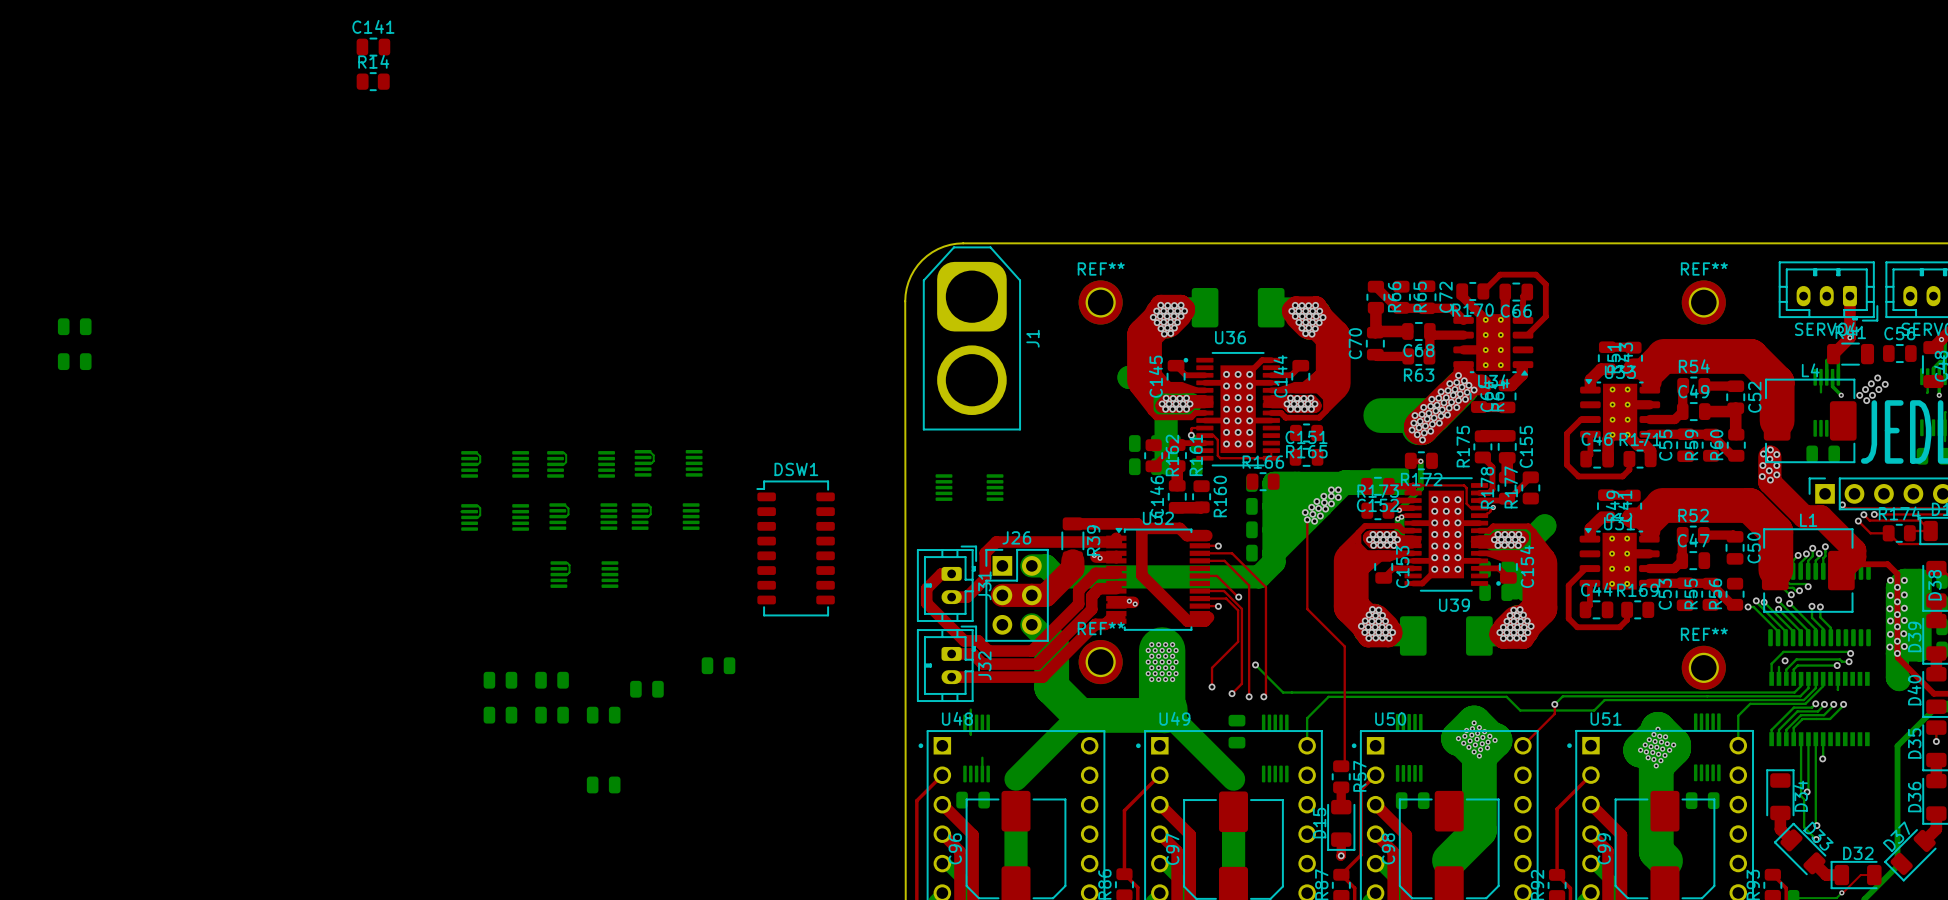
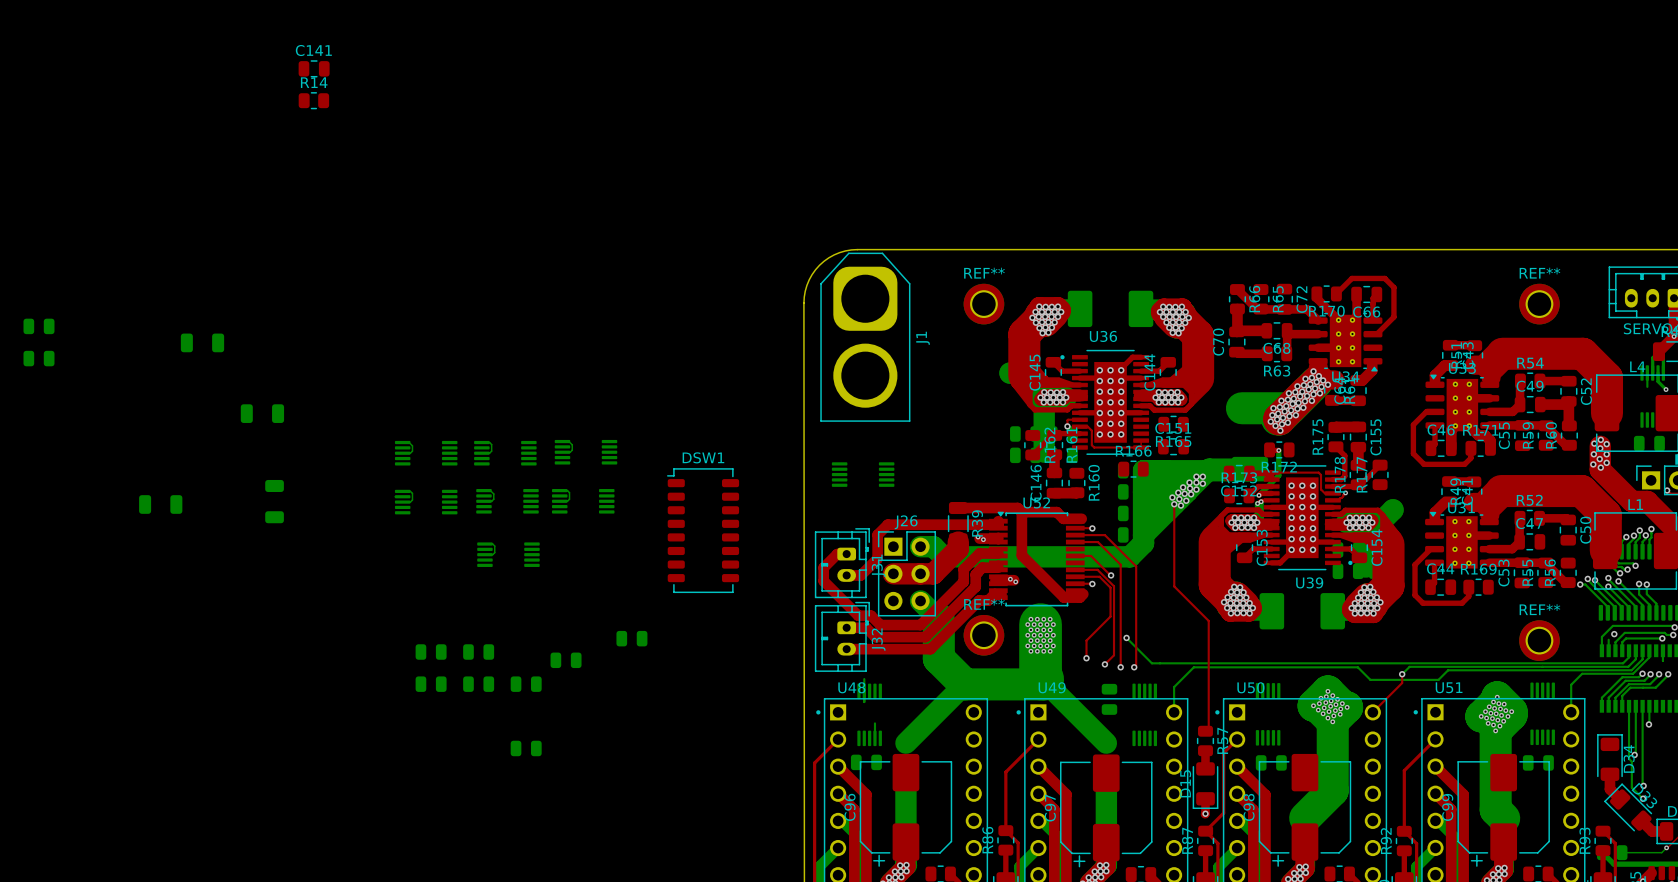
part: none -> (202, 342)
part: none -> (262, 413)
part: none -> (274, 501)
part: none -> (160, 504)

